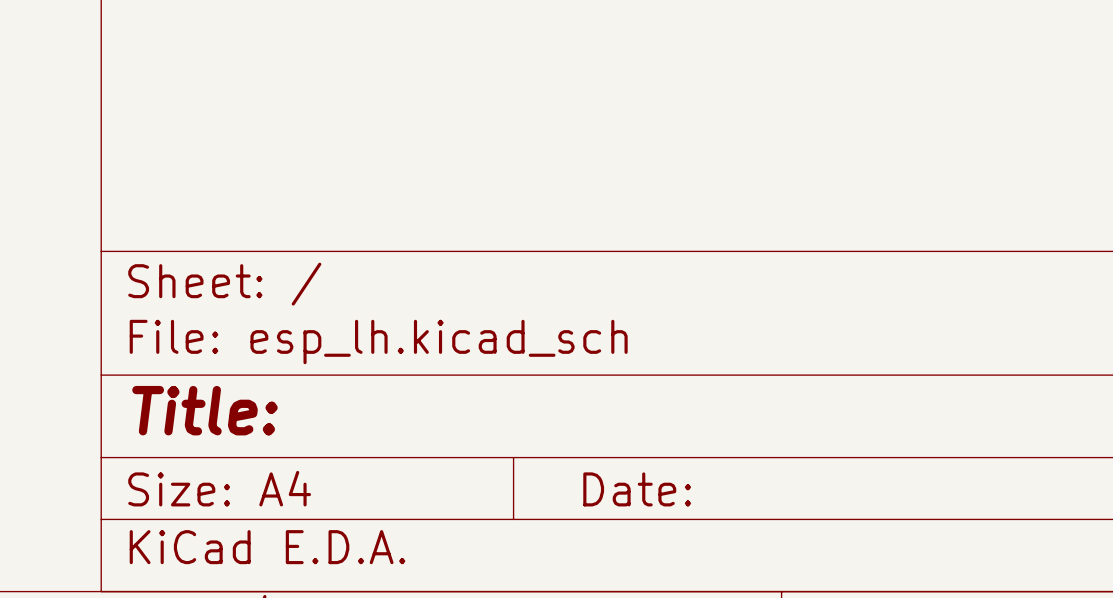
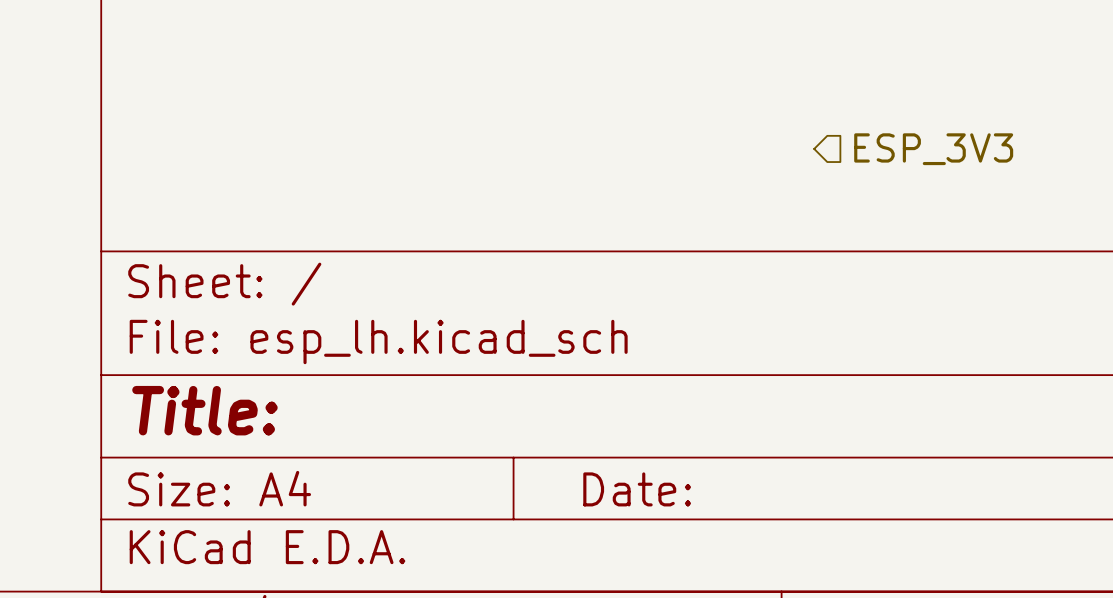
hierarchical label: none -> ESP_3V3 (933, 149)

